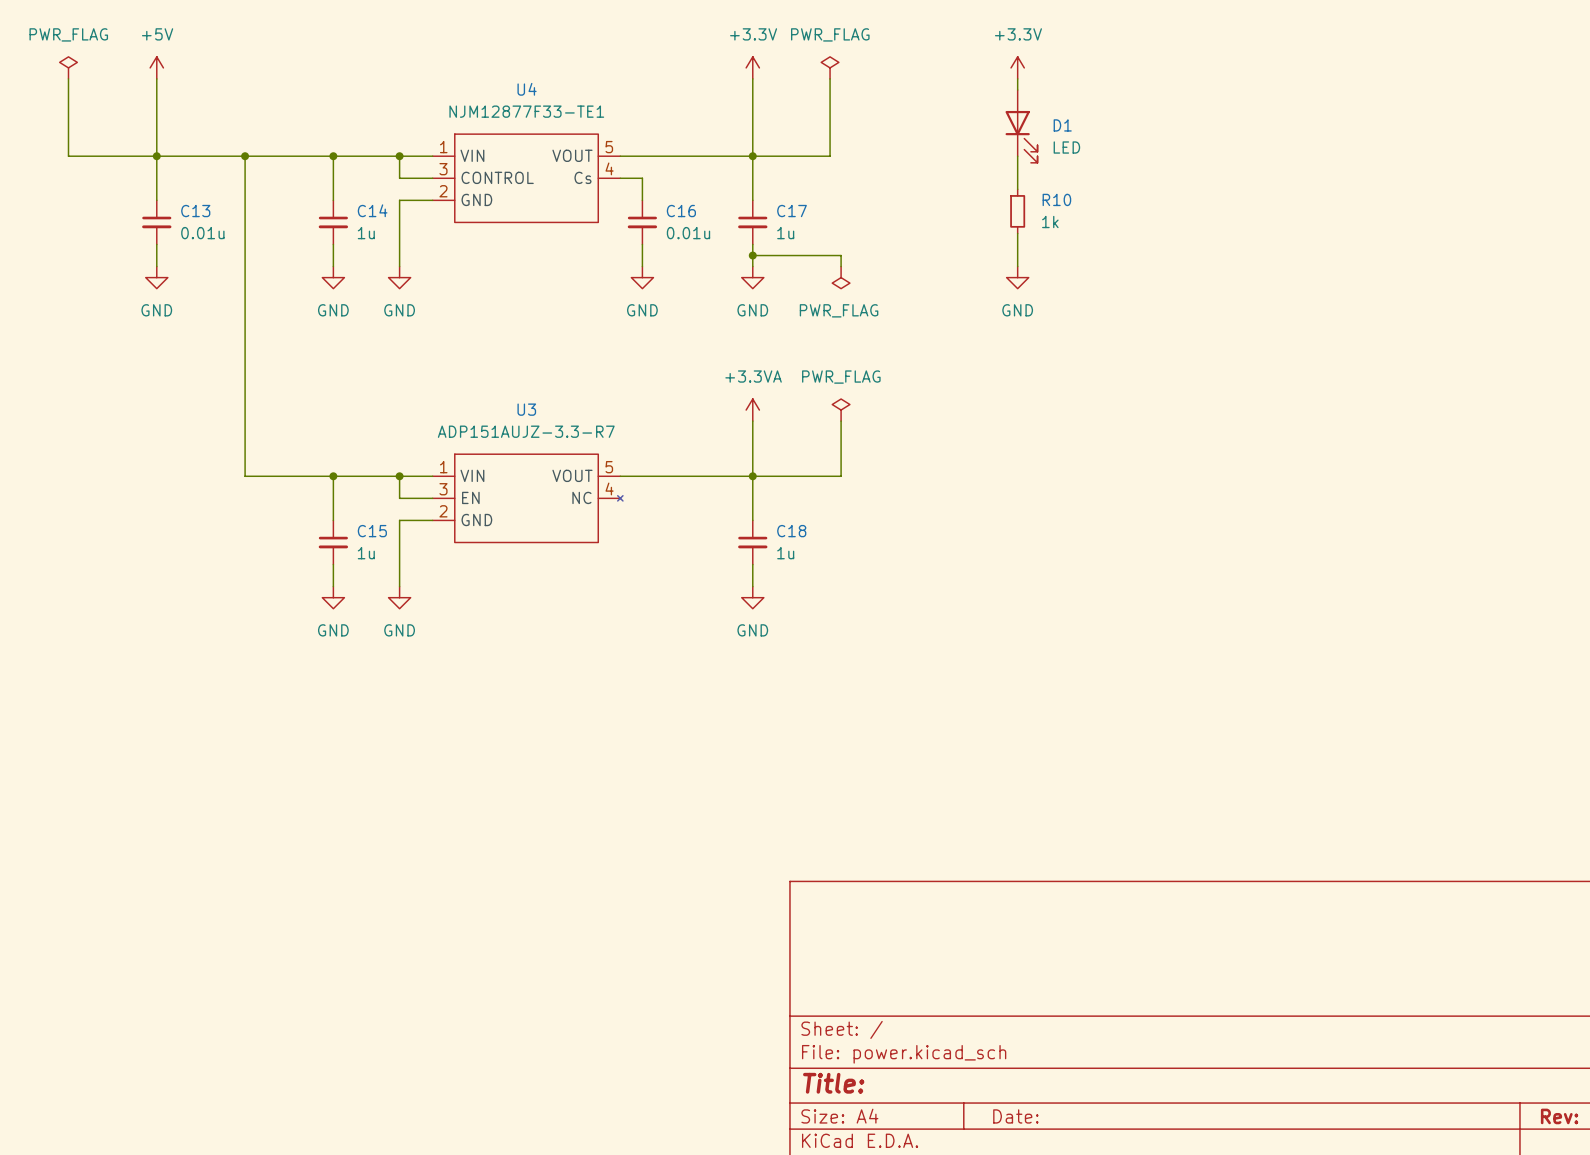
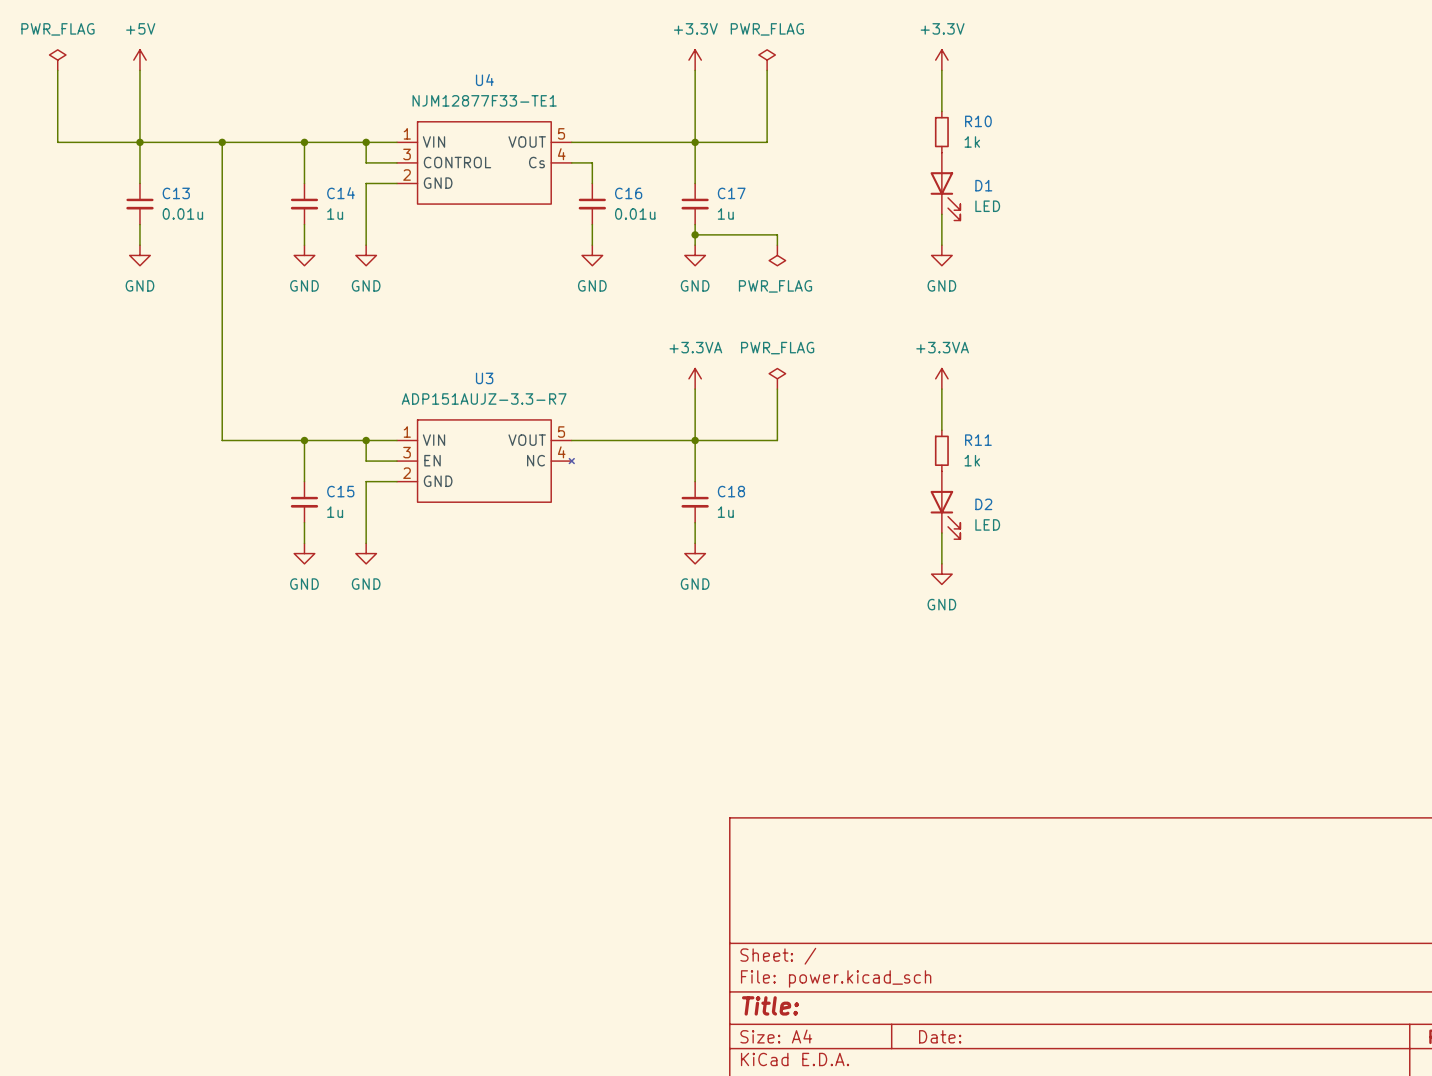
D1 position: (1021, 126) -> (945, 186)
R10 position: (1017, 211) -> (941, 132)
power symbol: none -> +3.3VA (941, 378)
wire: none -> (941, 389) (941, 430)
R11: none -> 1k (941, 450)
D2: none -> LED (945, 505)
wire: none -> (941, 533) (941, 563)
power symbol: none -> GND (941, 574)

